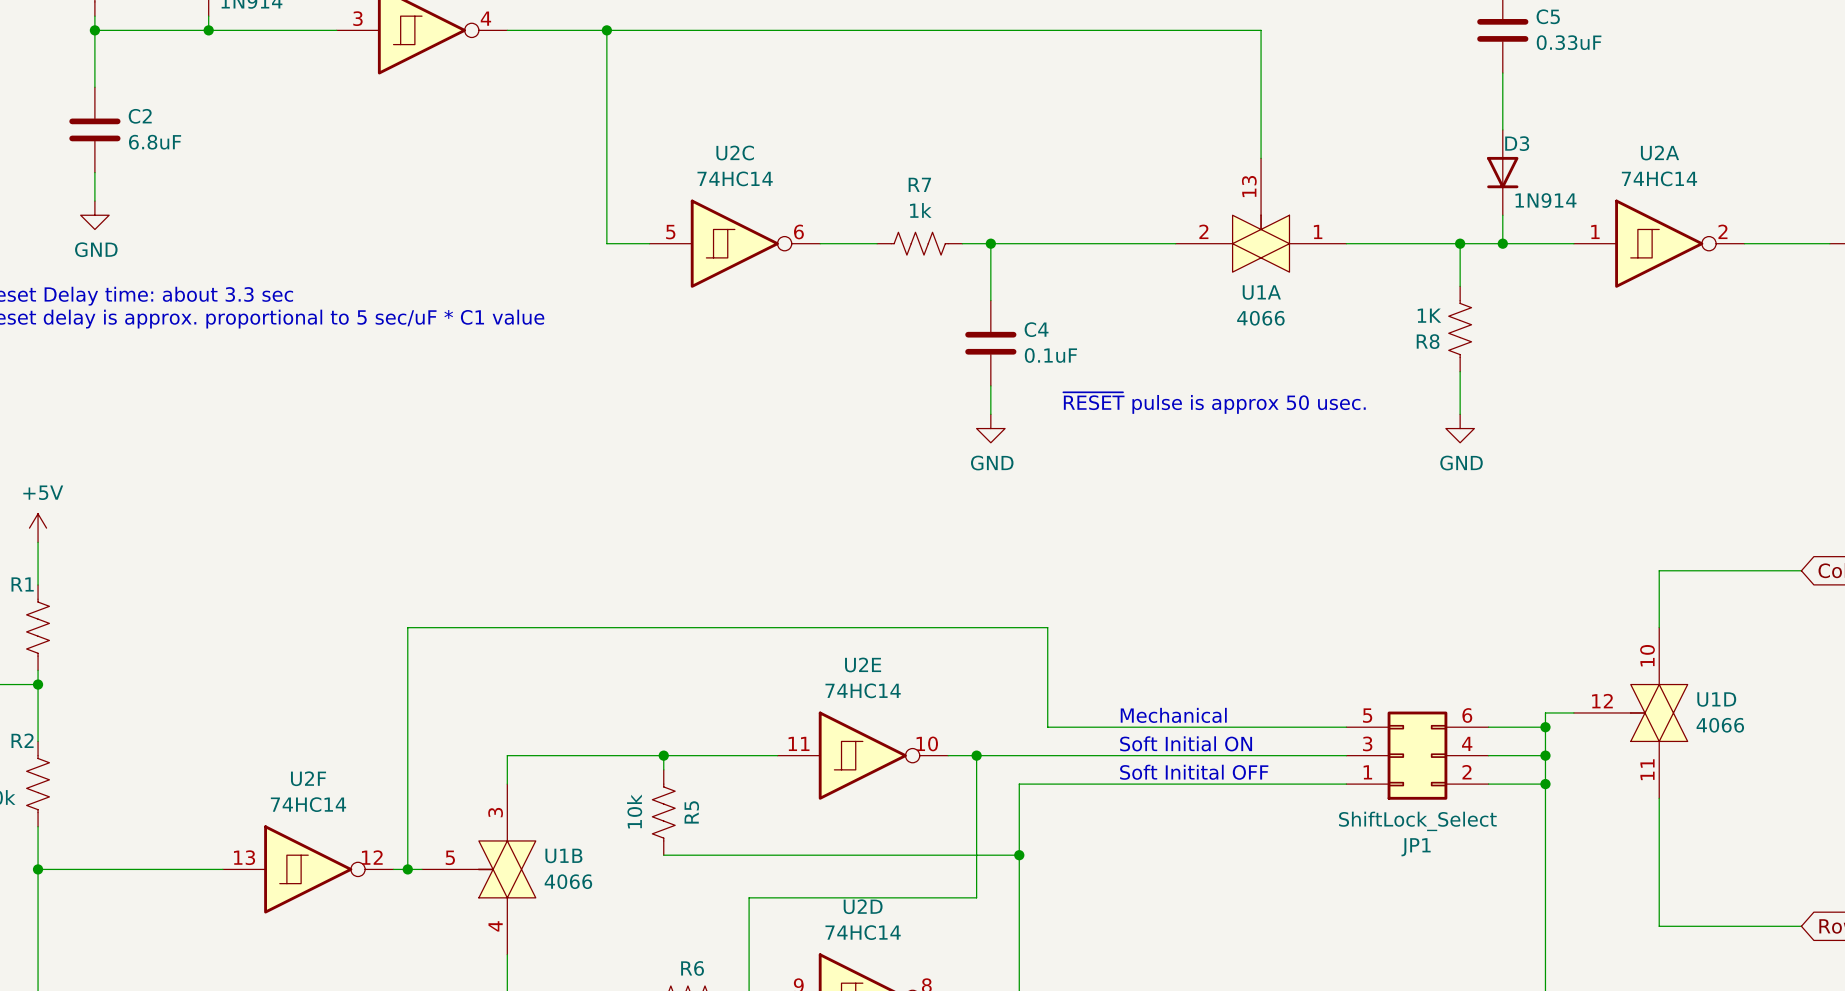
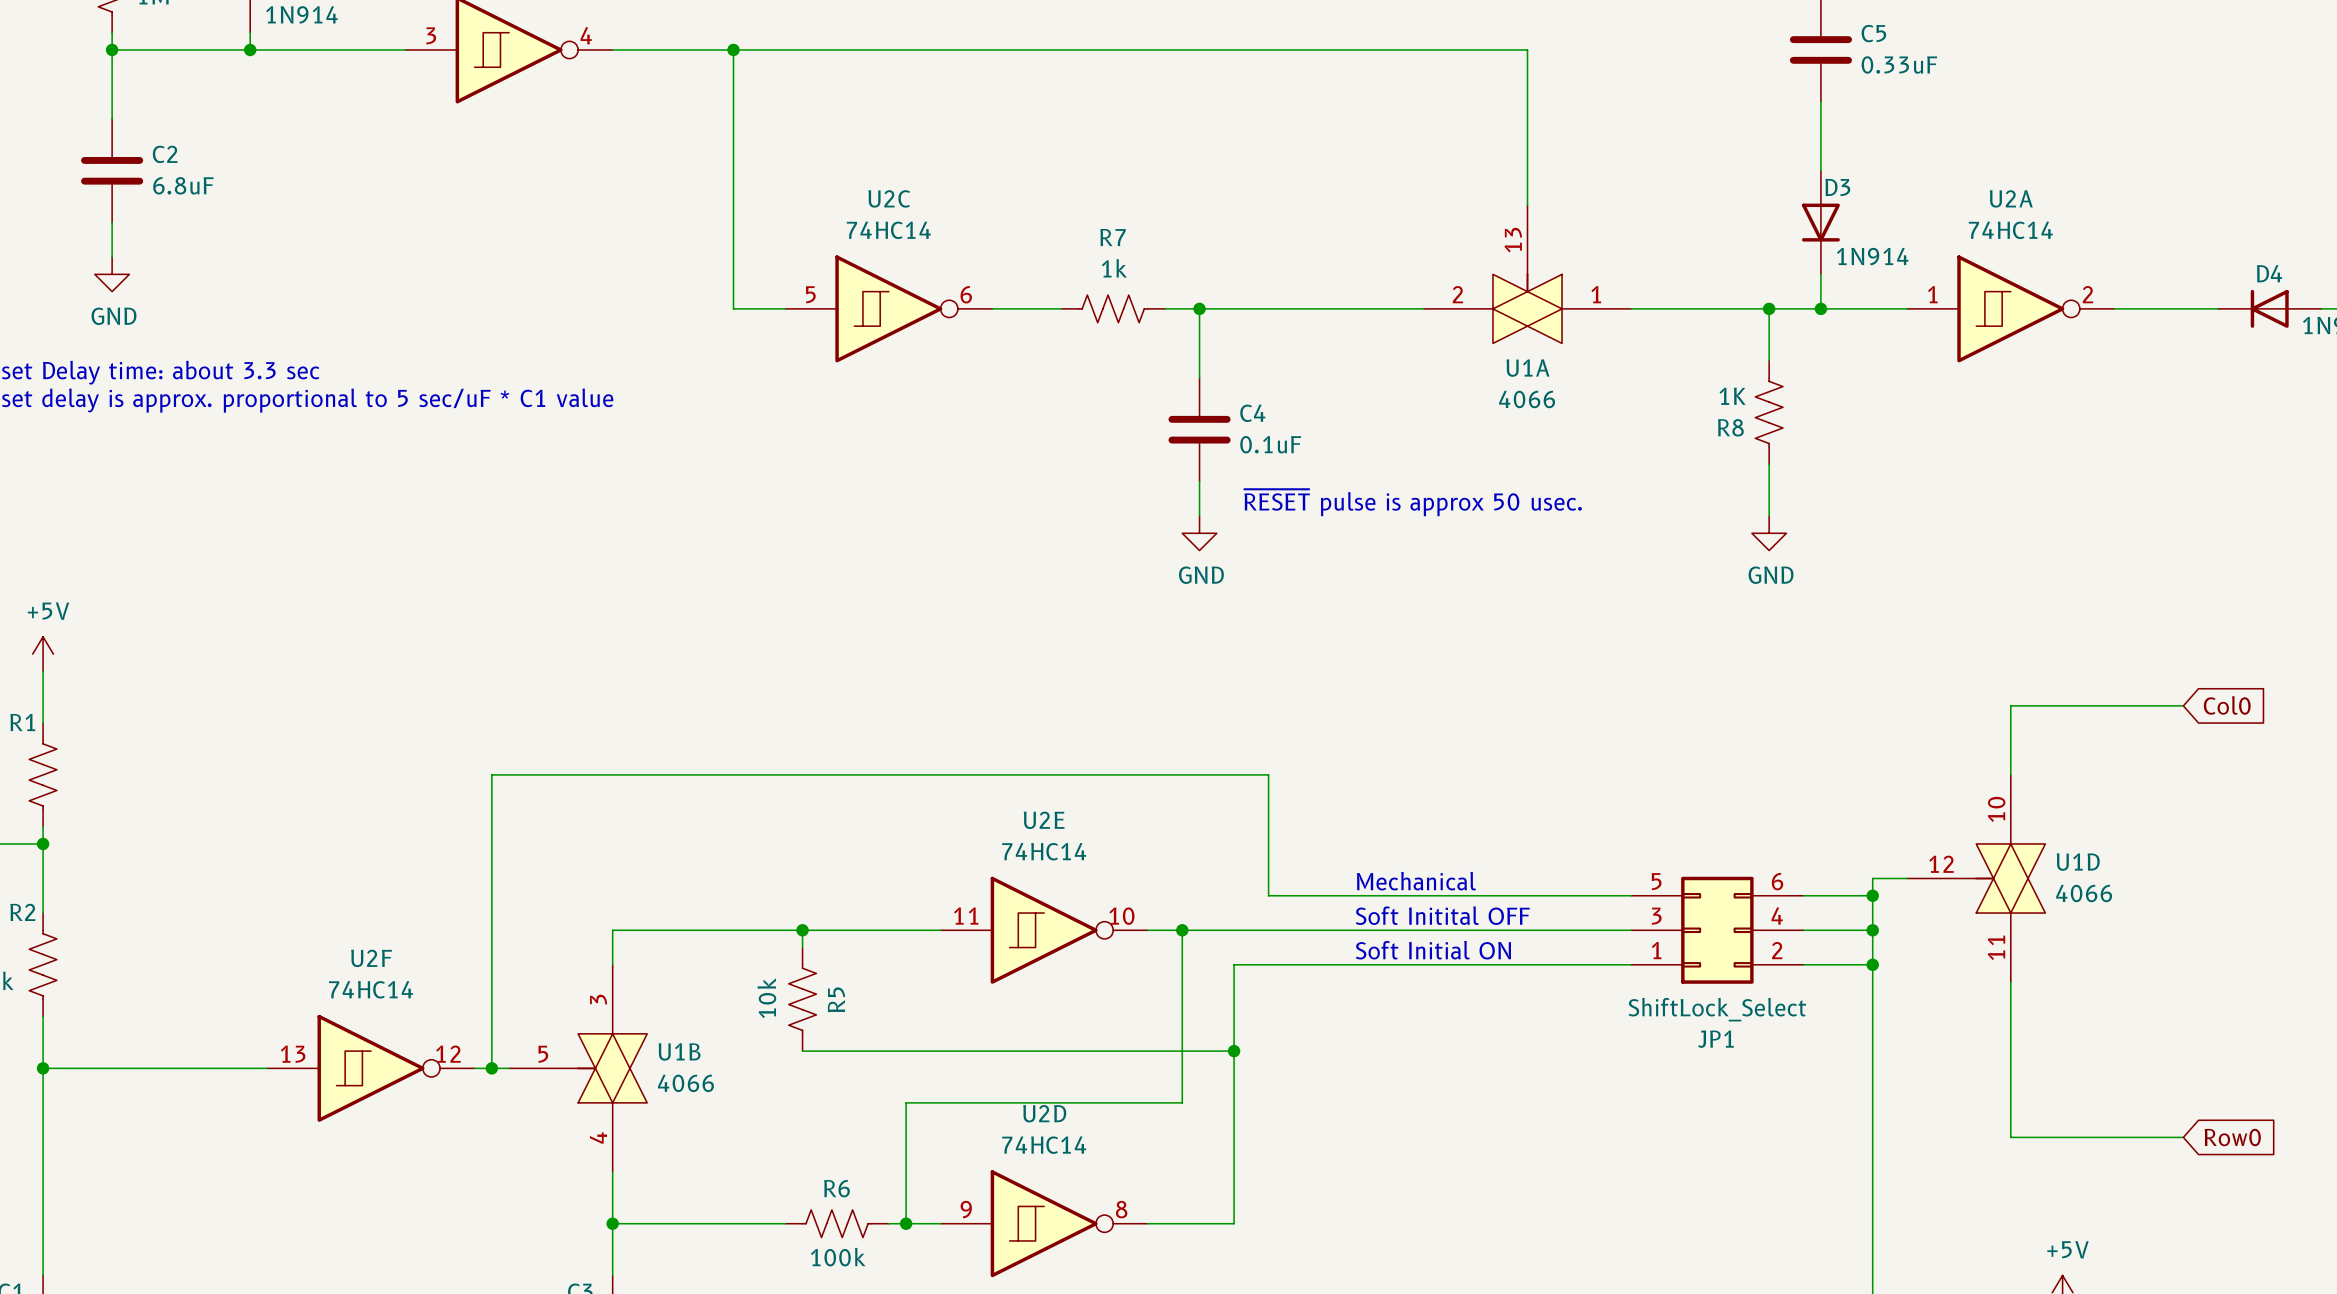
text position: ~{RESET} pulse is approx 50 usec. (1214, 403) -> ~{RESET} pulse is approx 50 usec. (1413, 502)
text: Soft Initial ON (1186, 743) -> Soft Initital OFF (1442, 915)
text: Soft Initital OFF (1194, 772) -> Soft Initial ON (1433, 950)

